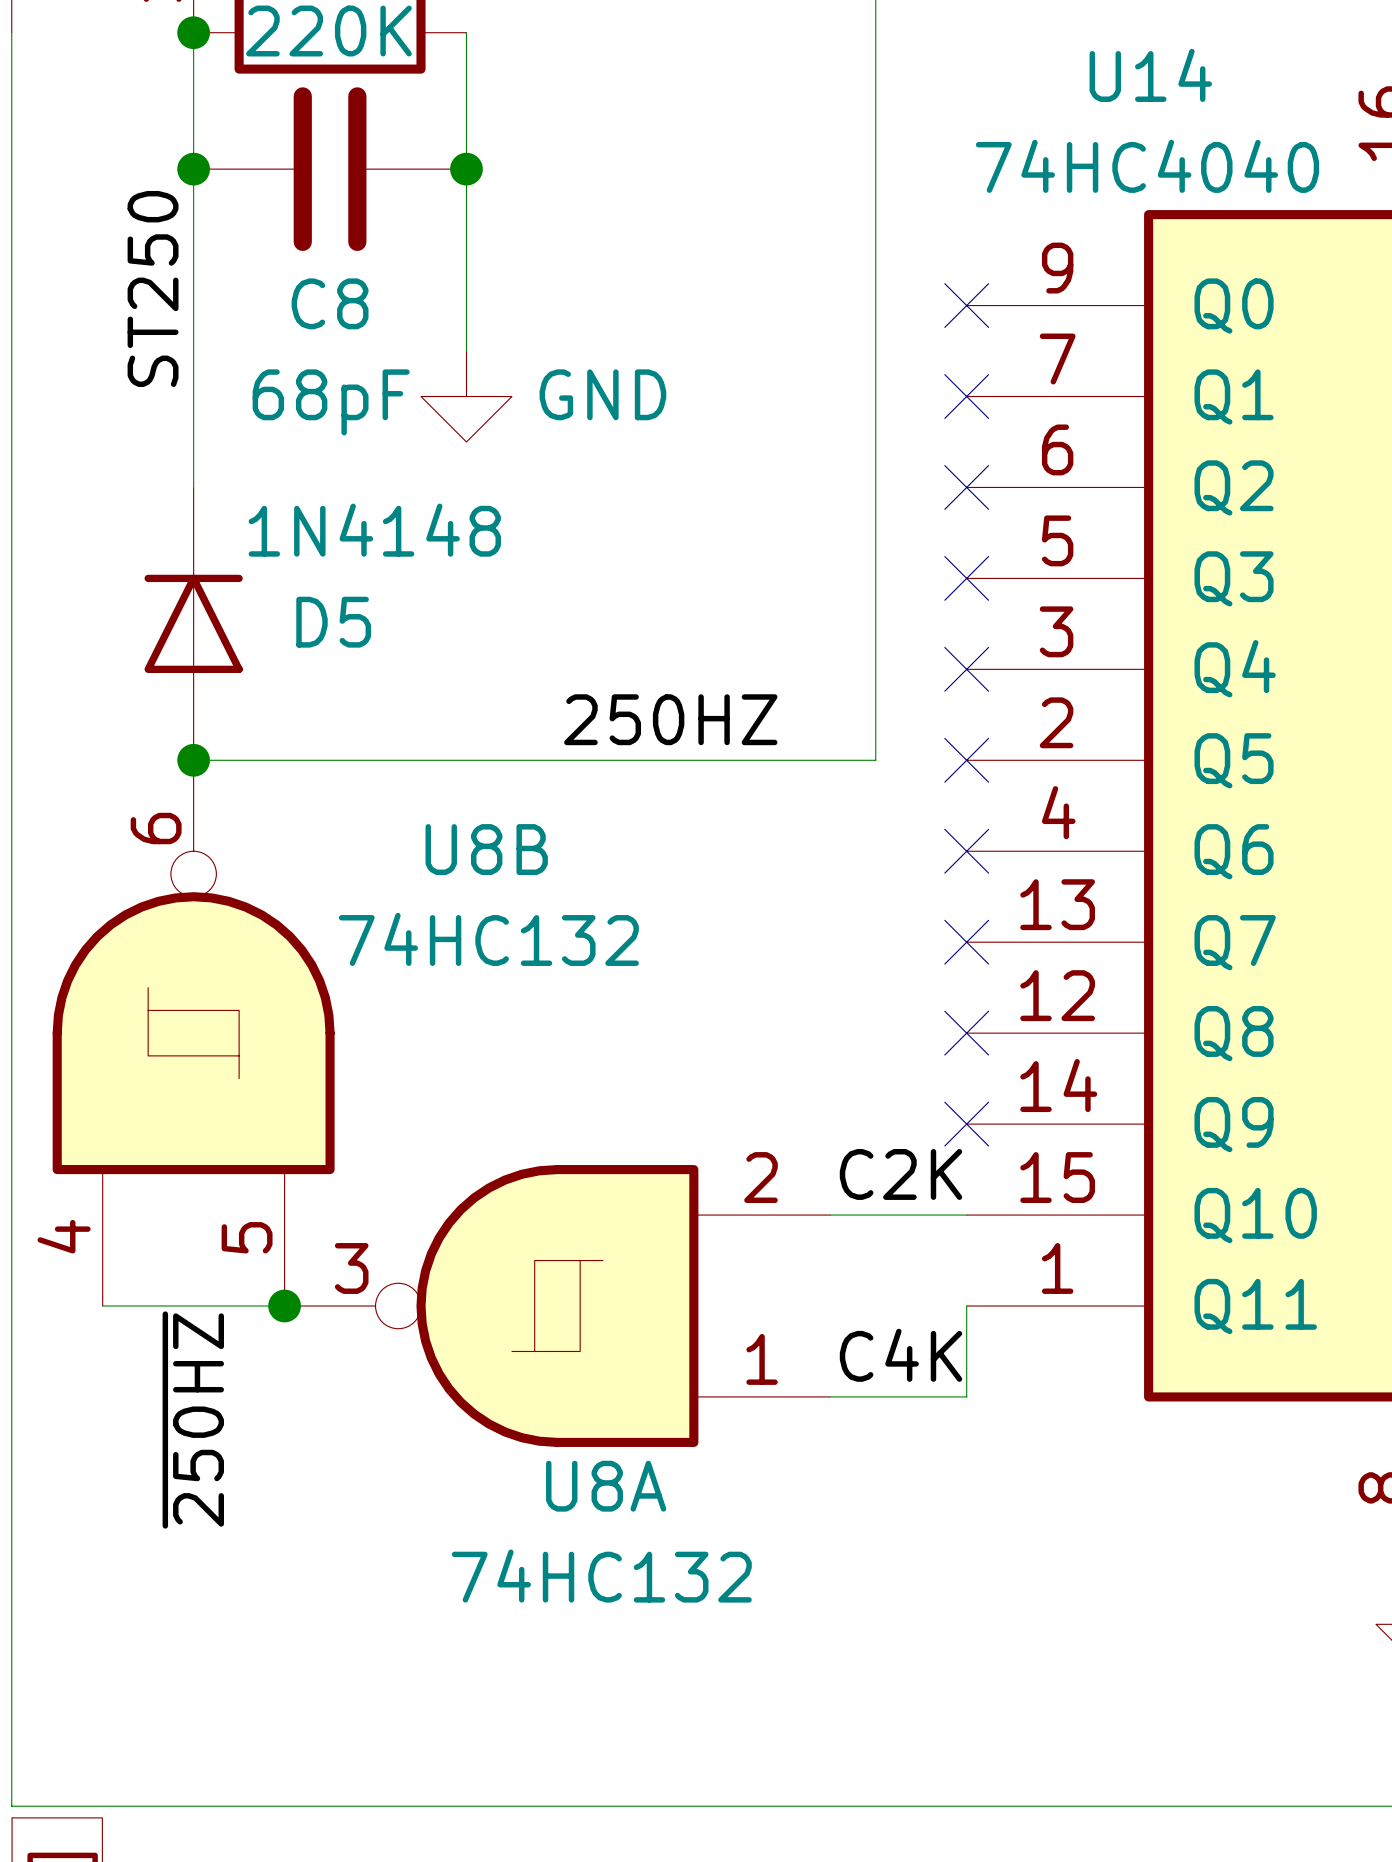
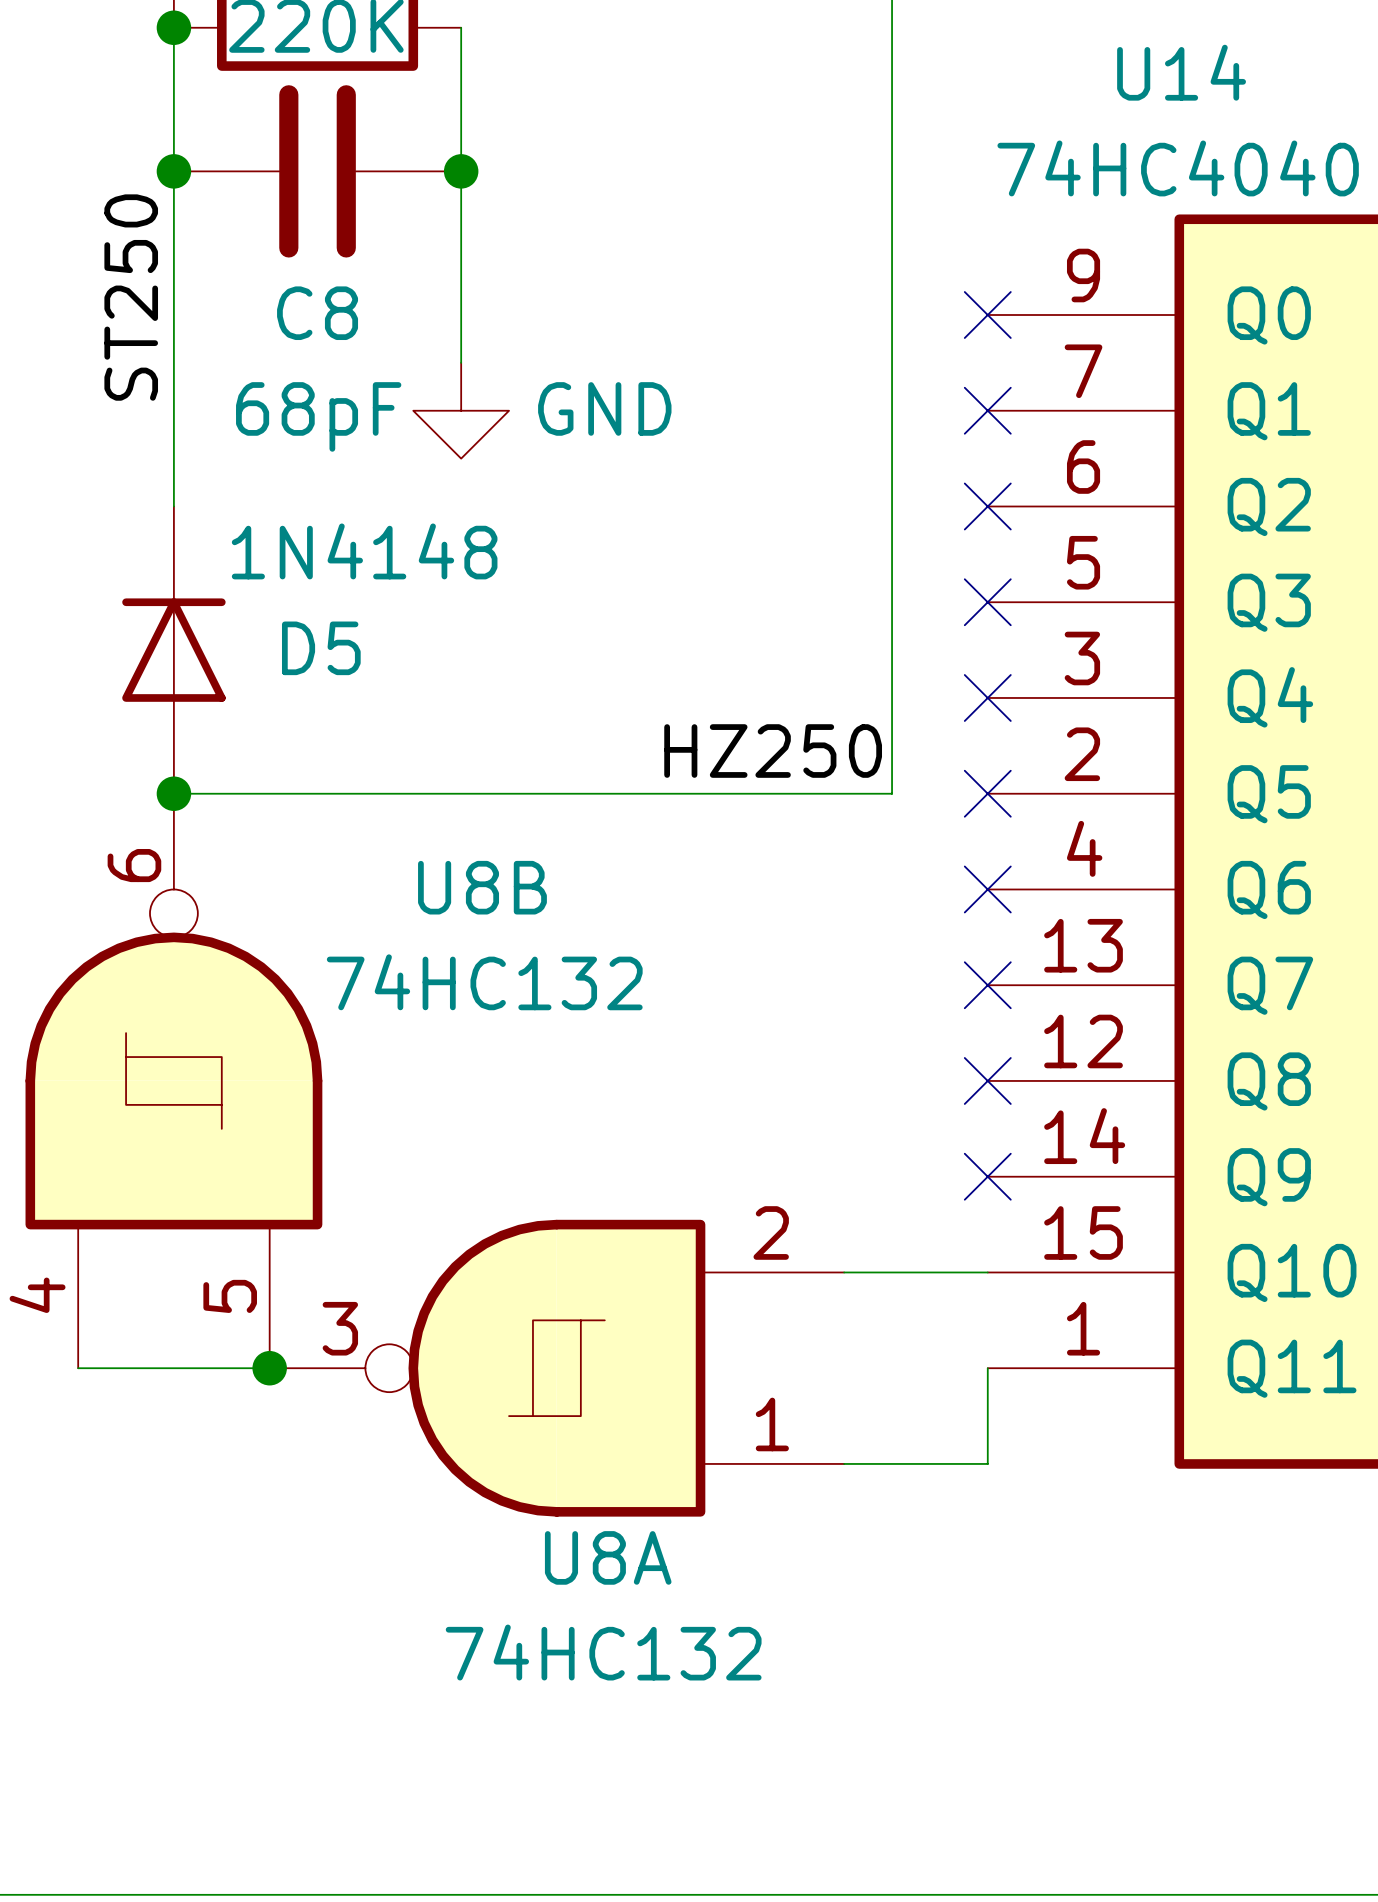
label: 250HZ (670, 719) -> none
label: none -> HZ250 (773, 751)
label: C2K (900, 1174) -> none
label: C4K (900, 1355) -> none
label: ~{250HZ} (193, 1420) -> none

